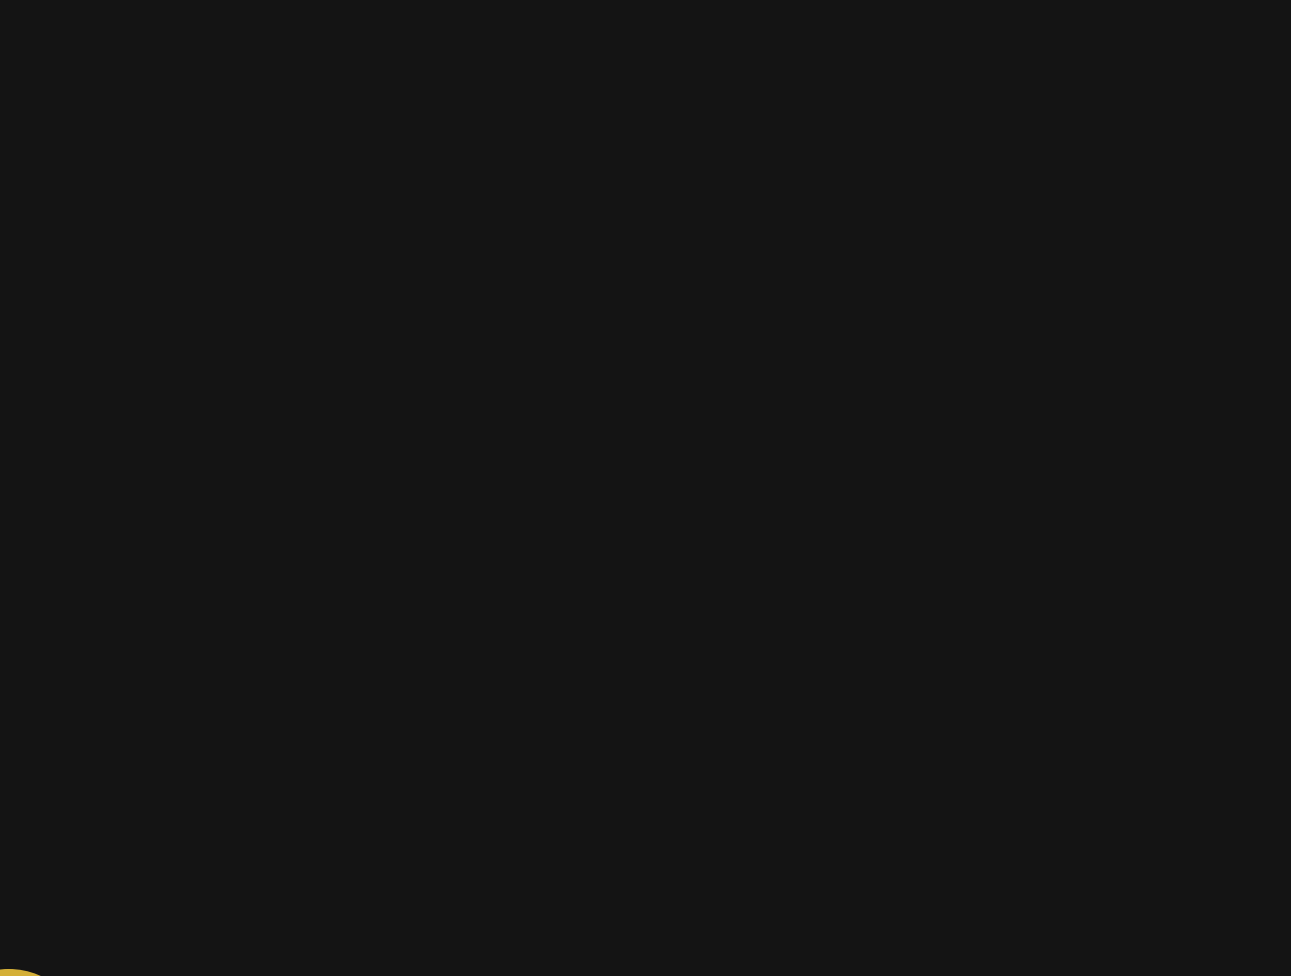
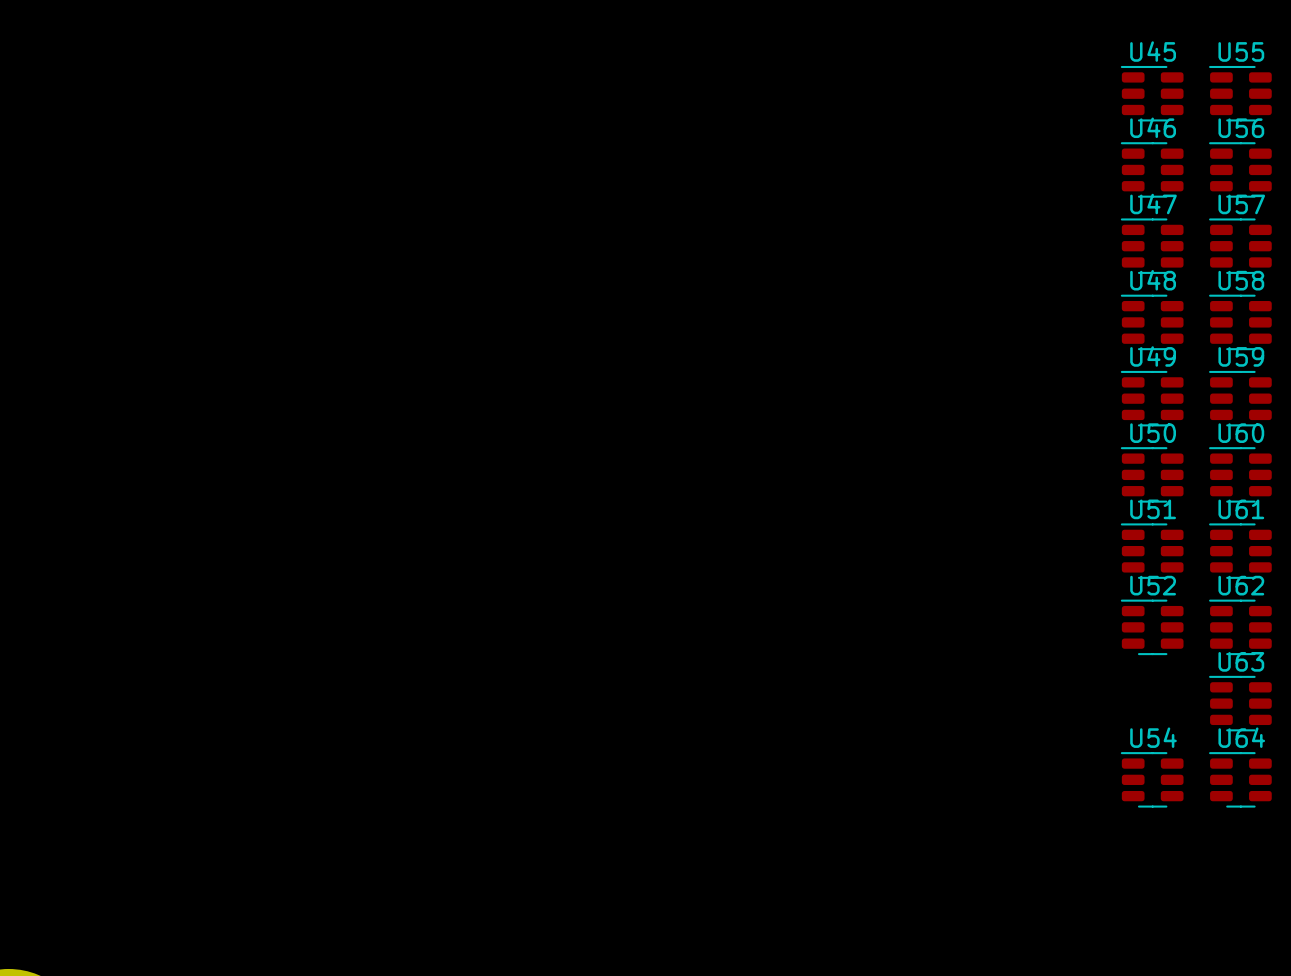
U45: none -> (1152, 93)
U55: none -> (1240, 93)
U46: none -> (1152, 169)
U56: none -> (1240, 169)
U47: none -> (1152, 246)
U57: none -> (1240, 246)
U48: none -> (1152, 322)
U58: none -> (1240, 322)
U49: none -> (1152, 398)
U59: none -> (1240, 398)
U50: none -> (1152, 474)
U60: none -> (1240, 474)
U51: none -> (1152, 551)
U61: none -> (1240, 551)
U52: none -> (1152, 627)
U62: none -> (1240, 627)
U63: none -> (1240, 703)
U54: none -> (1152, 779)
U64: none -> (1240, 779)

